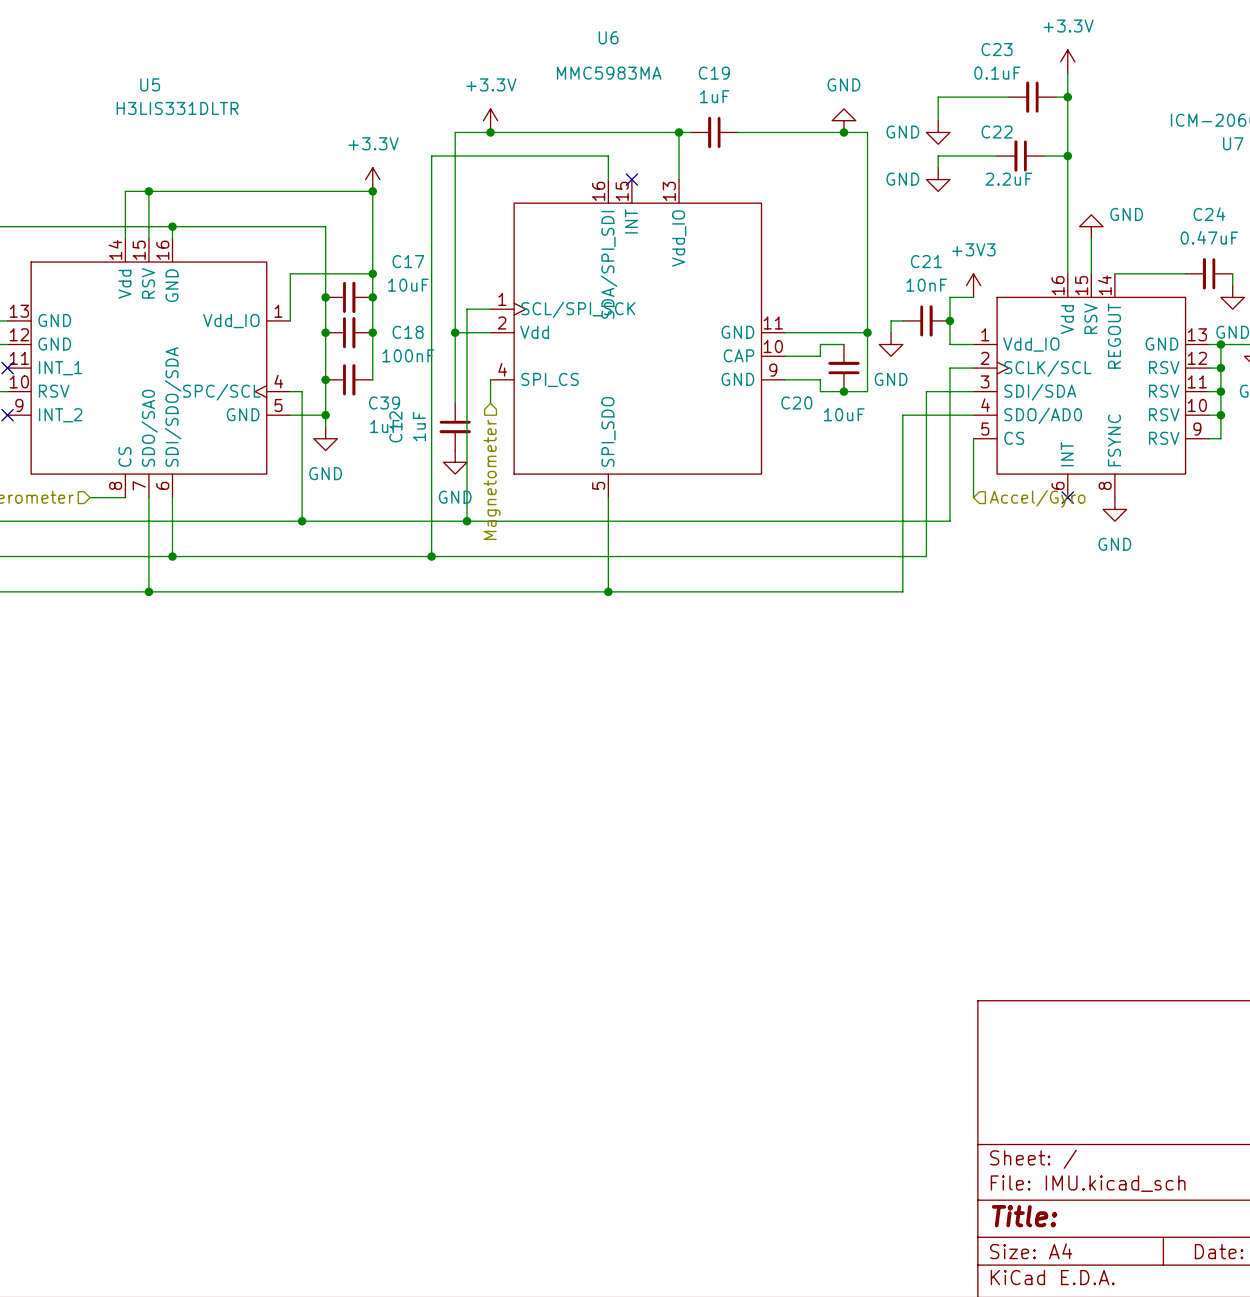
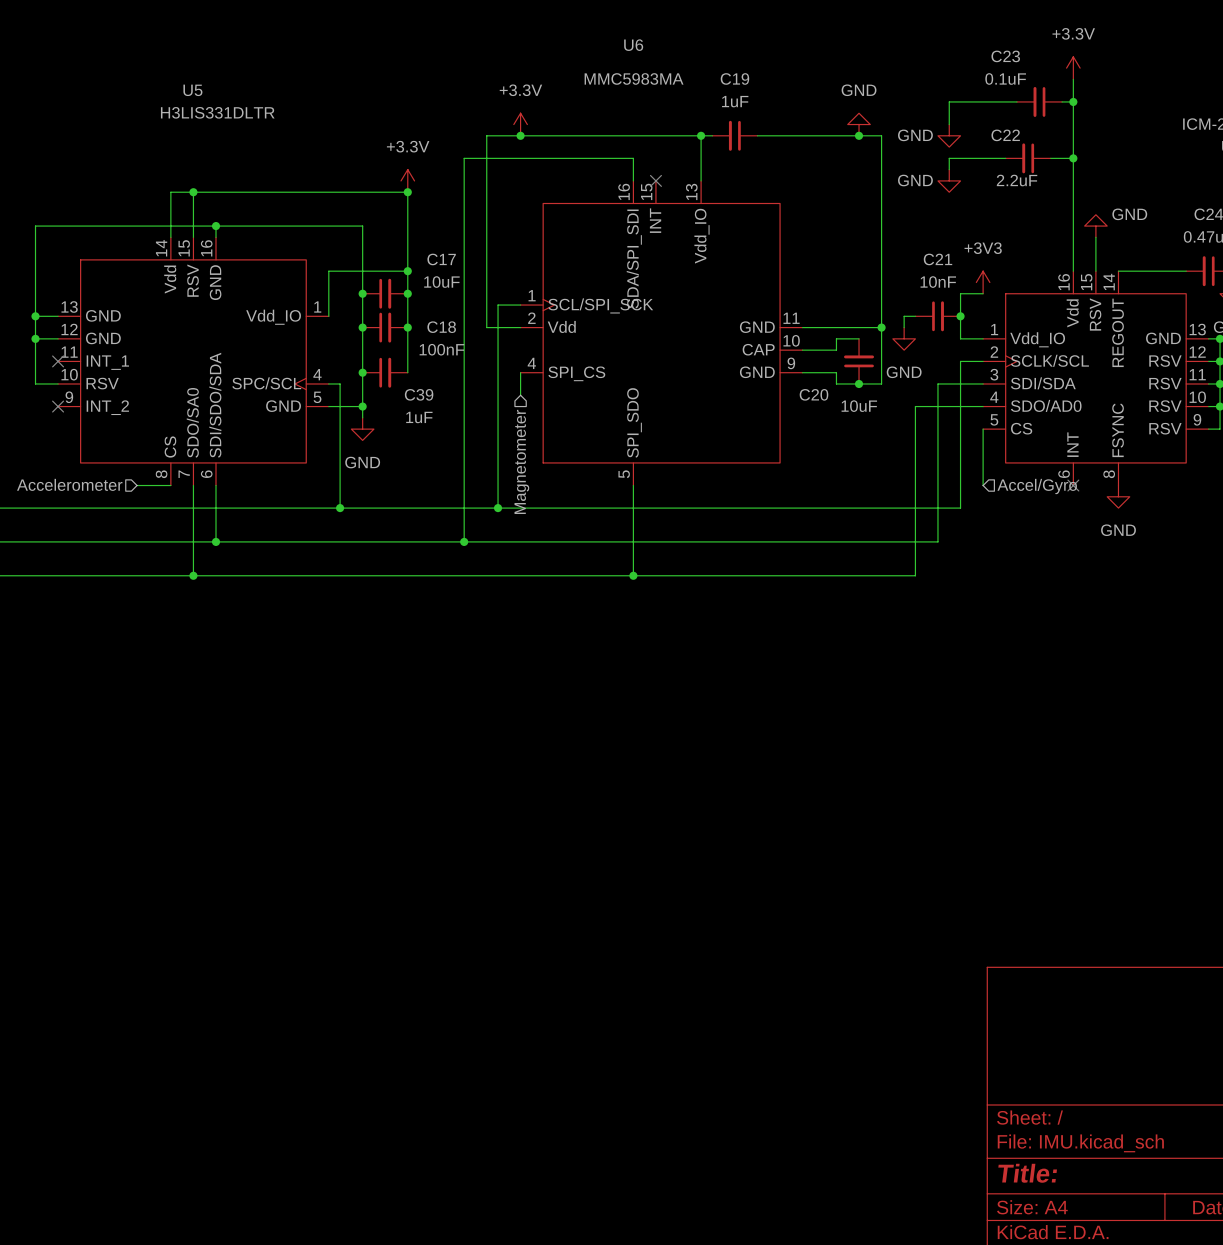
wire: (455, 332) (455, 403) -> none
junction: (455, 332) -> none
C12: 1uF (455, 426) -> none
power symbol: GND (455, 462) -> none

